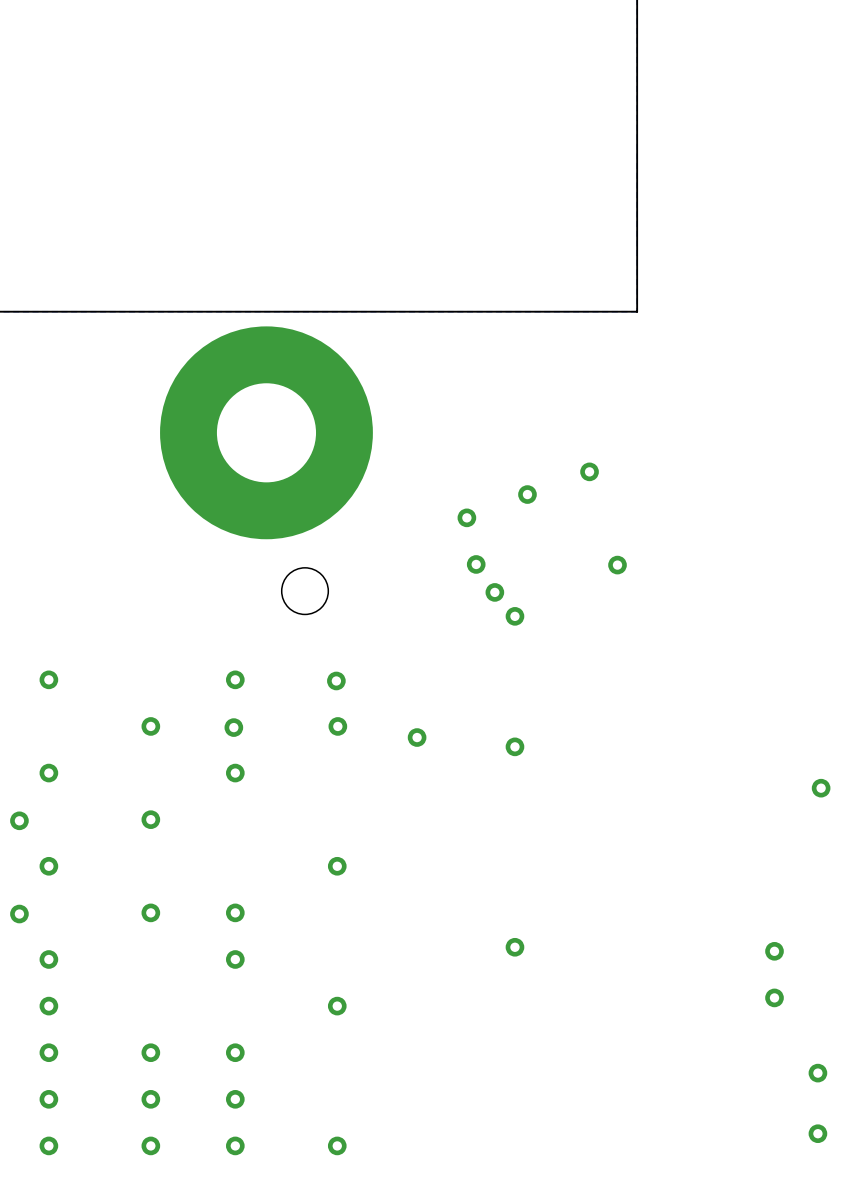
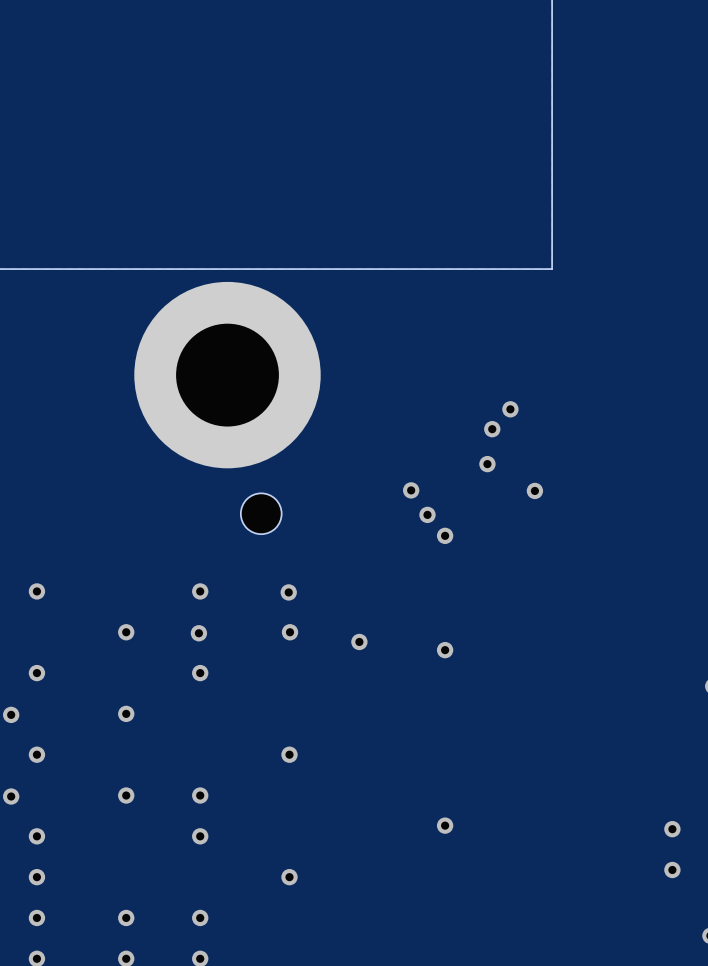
part footprint: [160, 326, 373, 540] -> [134, 281, 321, 469]
via: (527, 494) -> none
via: none -> (492, 429)
via: (466, 517) -> none
via: none -> (487, 464)

